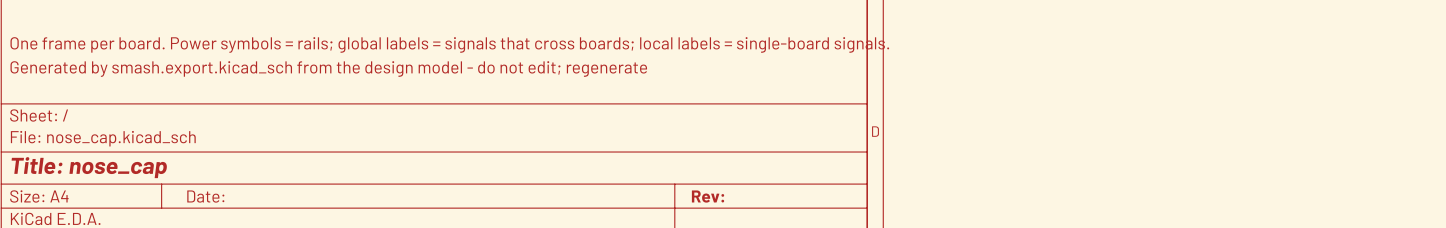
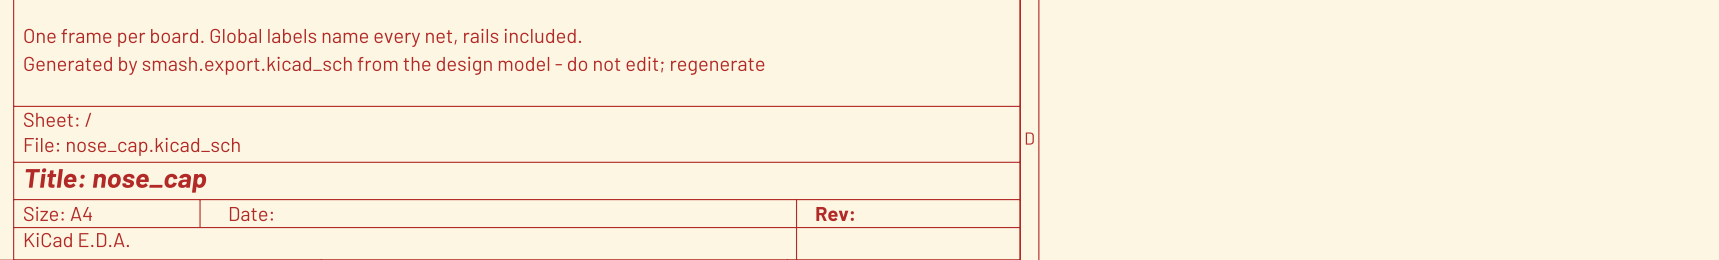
title block: One frame per board. Power symbols = rails; global labels = signals that cross boards; local labels = single-board signals. (449, 44) -> One frame per board. Global labels name every net, rails included. (302, 37)

